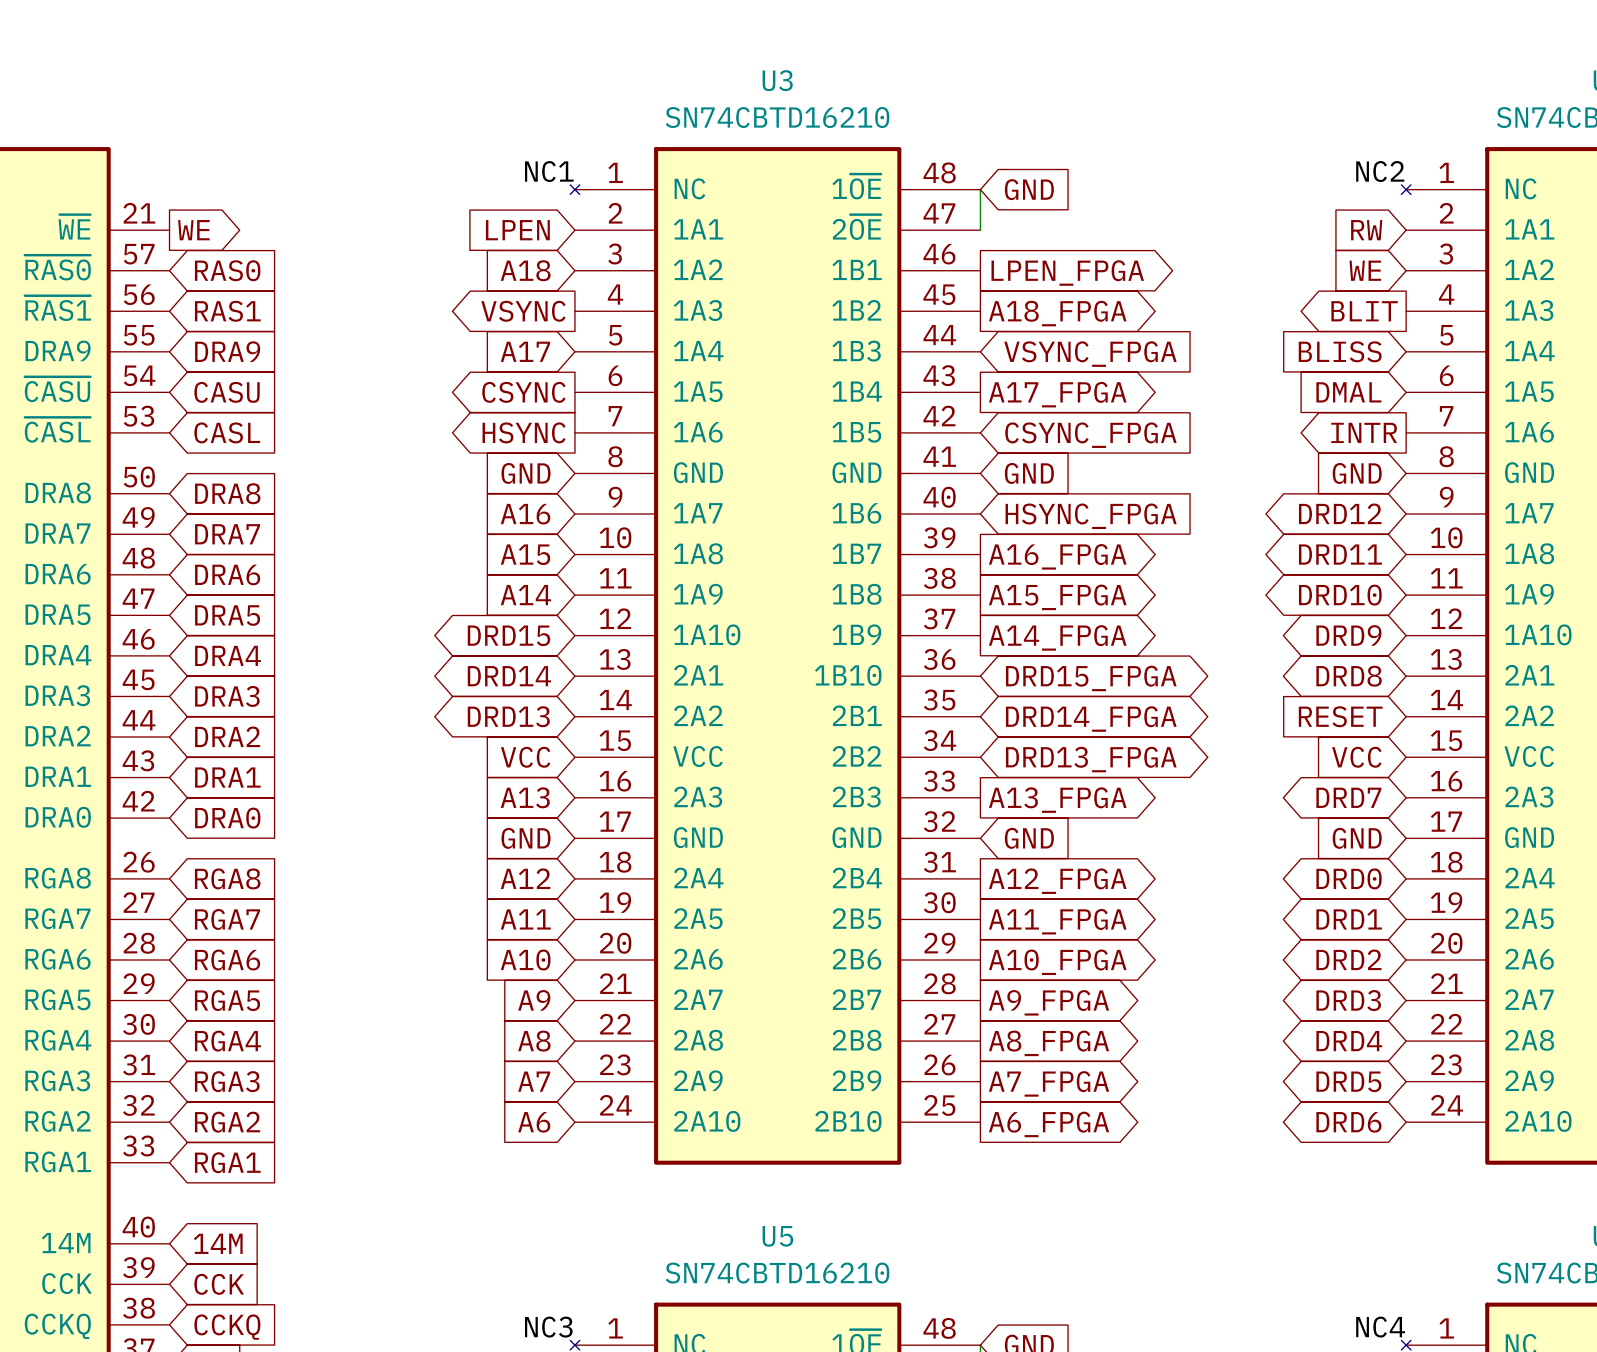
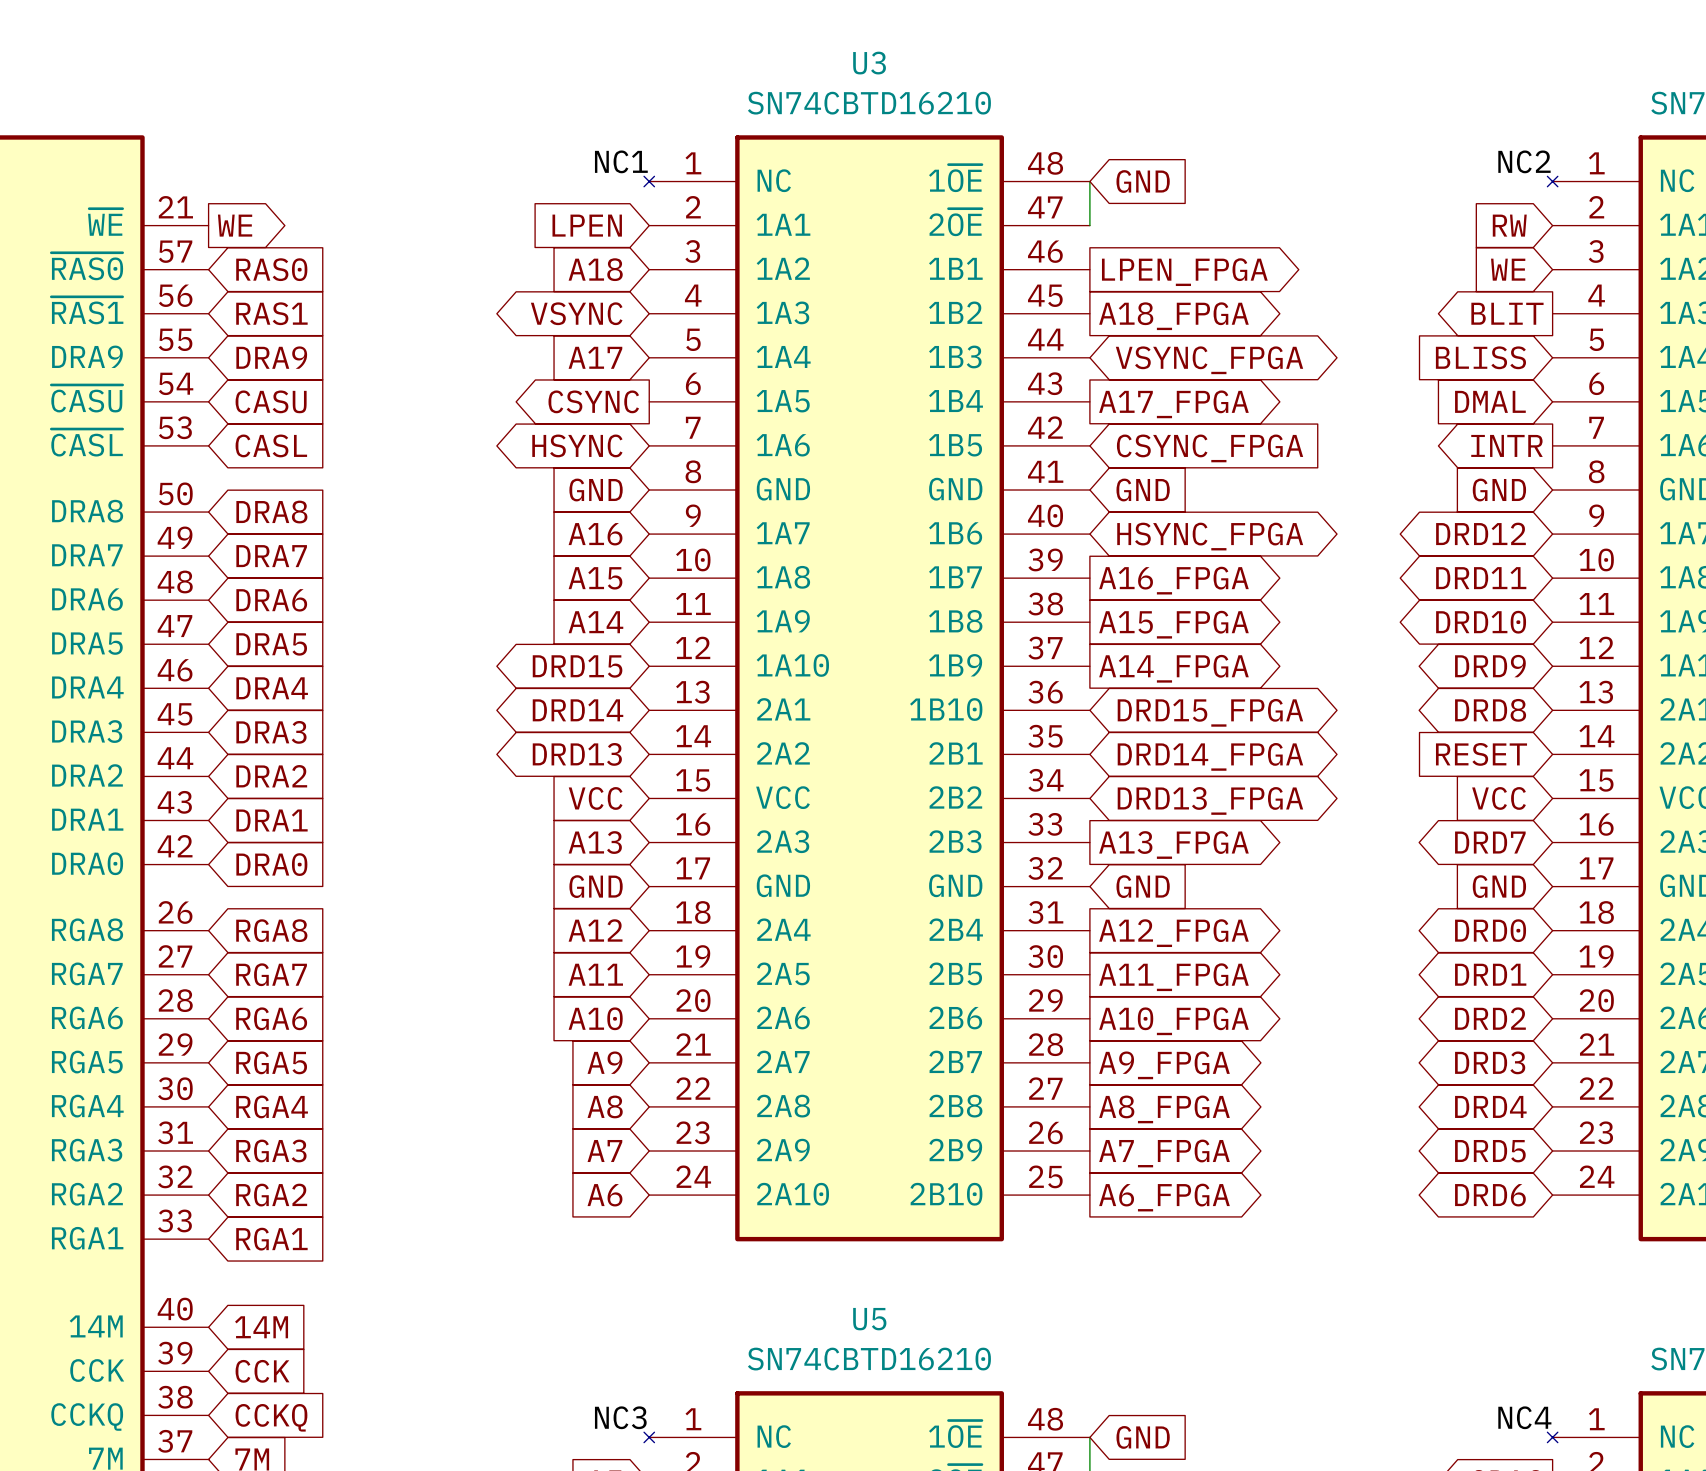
global label shape: output (523, 311) -> bidirectional (576, 313)
global label shape: input (1090, 354) -> bidirectional (1209, 360)
global label shape: output (524, 432) -> bidirectional (577, 445)
global label shape: input (1091, 516) -> bidirectional (1210, 536)

